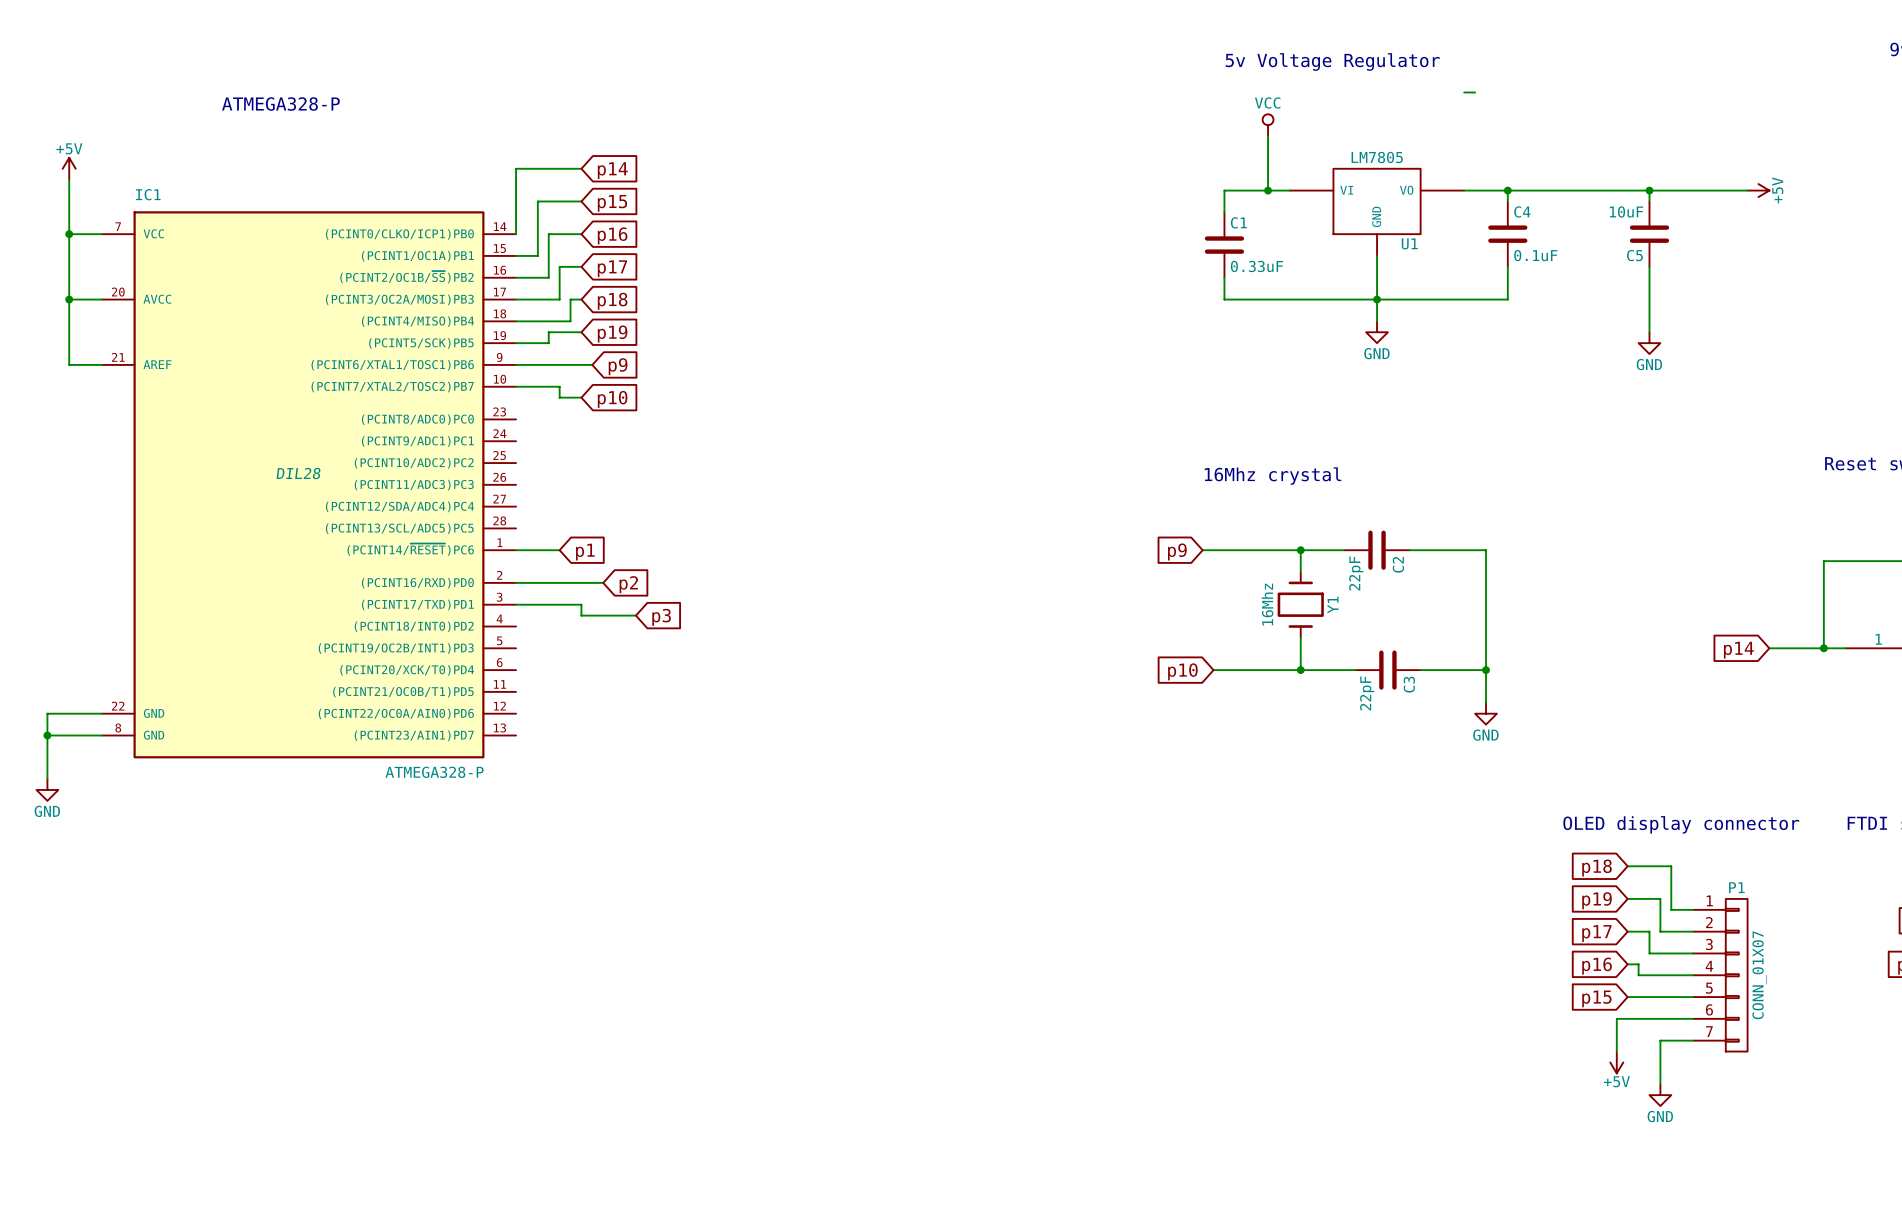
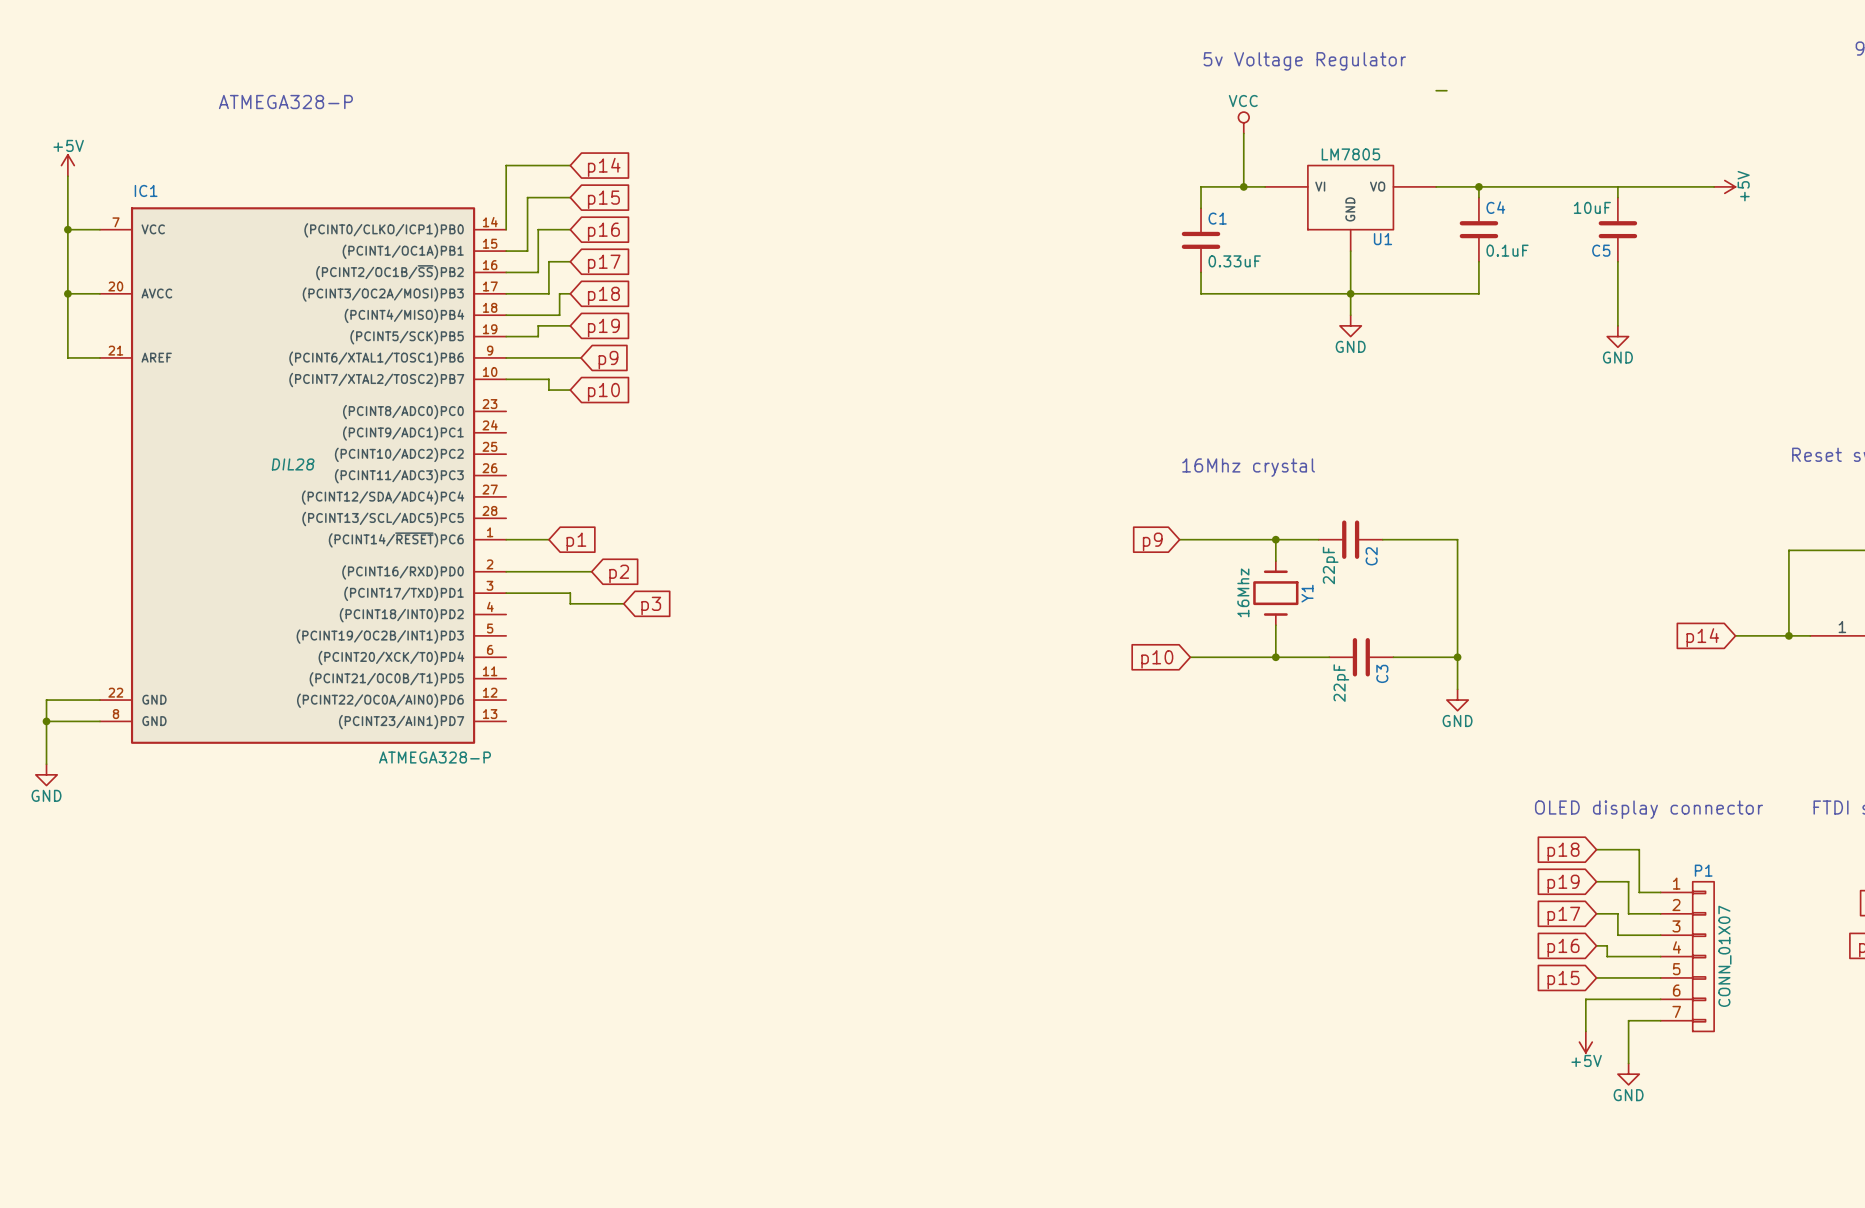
junction: (1649, 190) -> none

